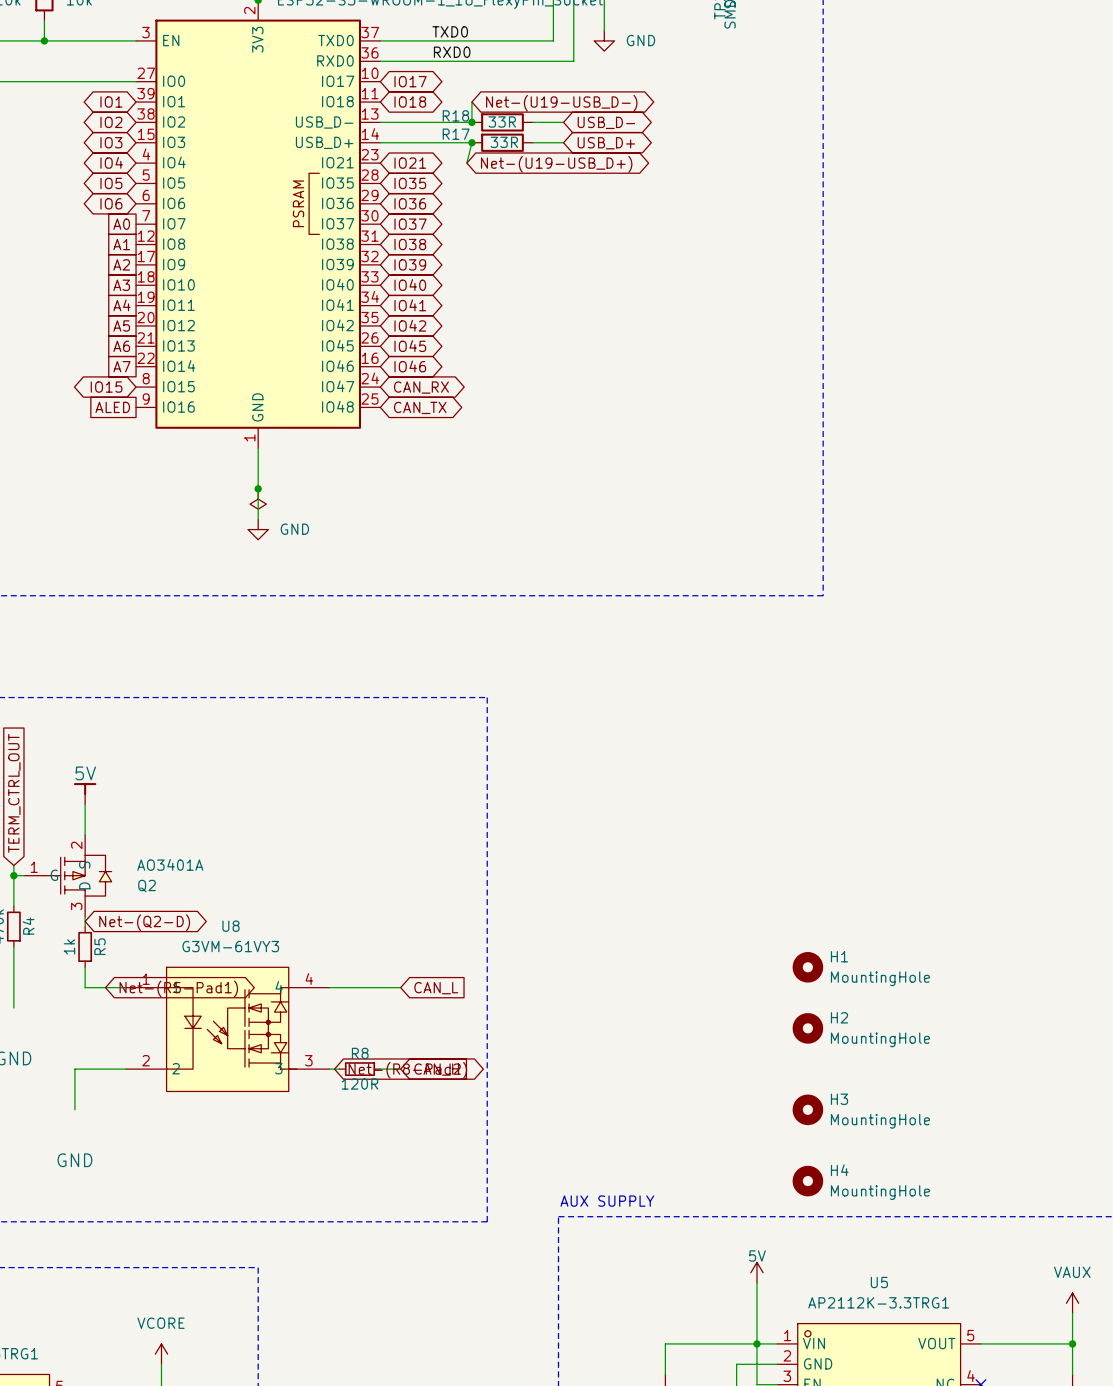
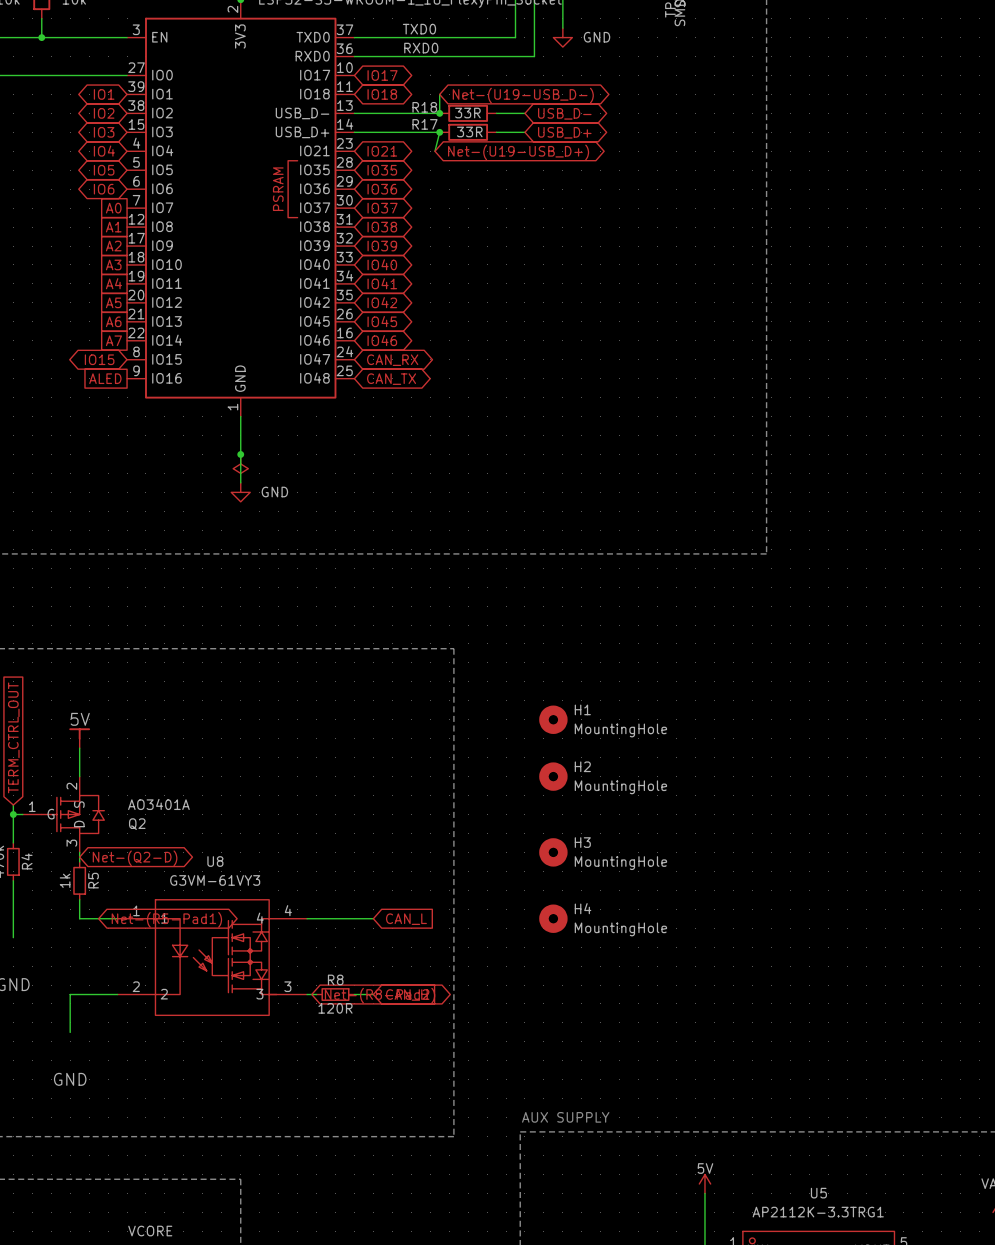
H1 position: (807, 967) -> (553, 719)
H2 position: (807, 1028) -> (553, 776)
H3 position: (807, 1109) -> (553, 852)
H4 position: (807, 1181) -> (553, 918)

